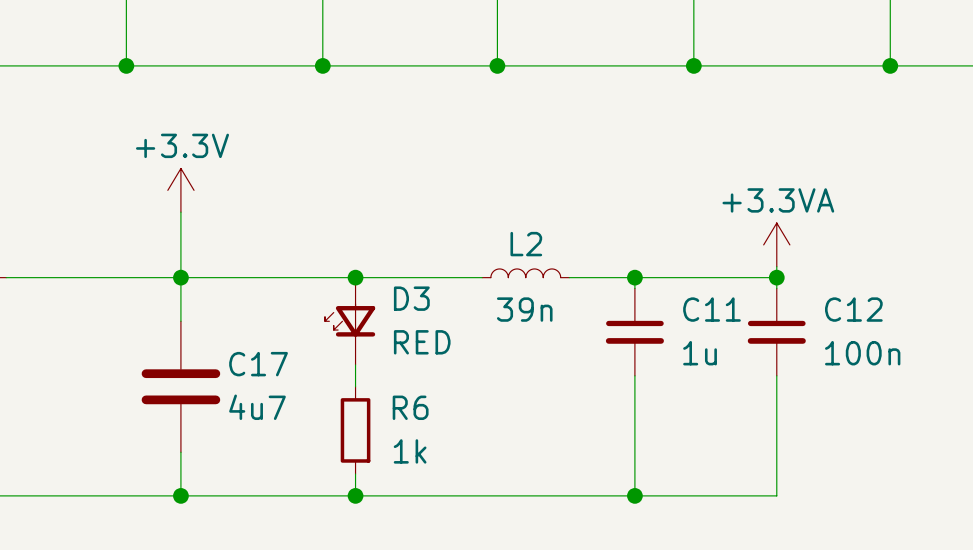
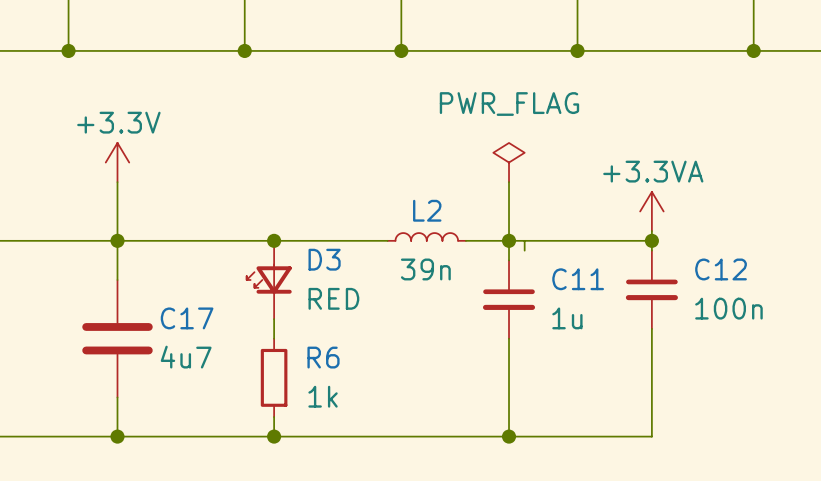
power symbol: none -> PWR_FLAG (509, 162)
wire: none -> (509, 182) (509, 260)
junction position: (634, 277) -> (509, 240)
C11 position: (634, 332) -> (509, 299)
wire: (634, 375) (634, 495) -> none
wire: none -> (509, 338) (509, 436)
junction position: (634, 495) -> (509, 436)

